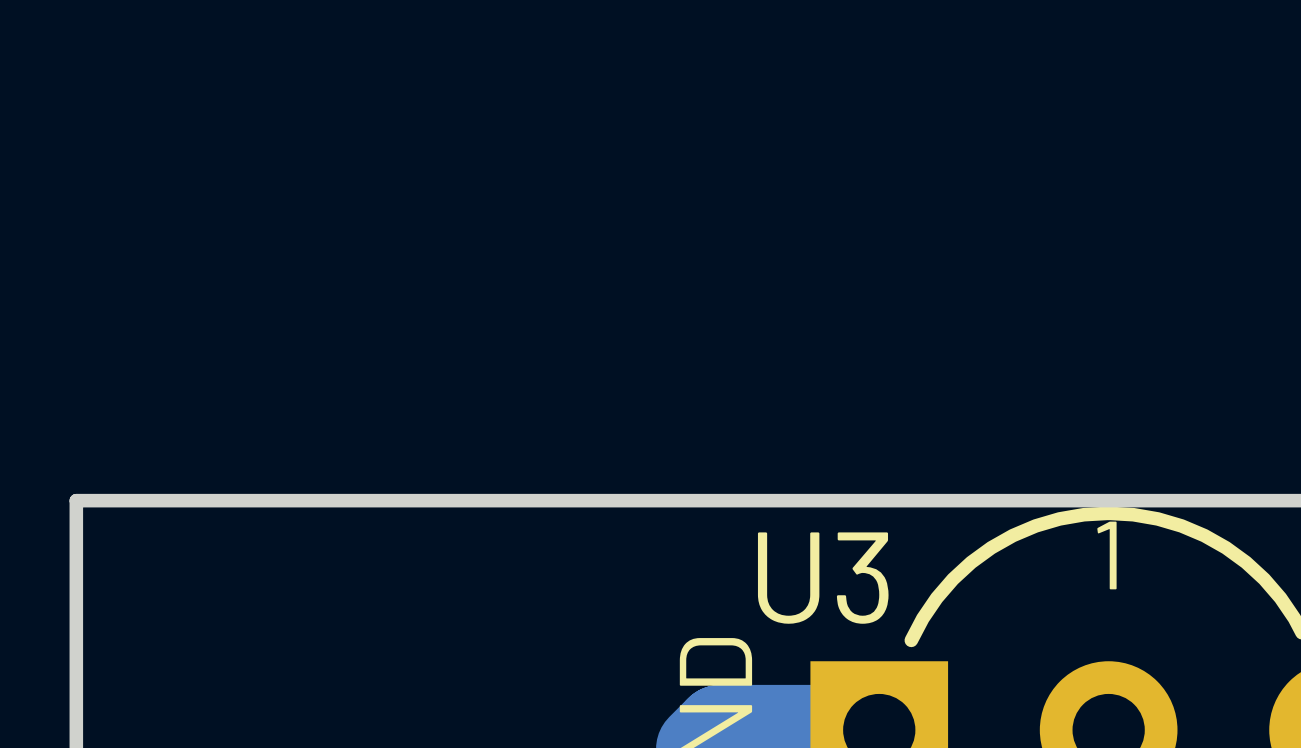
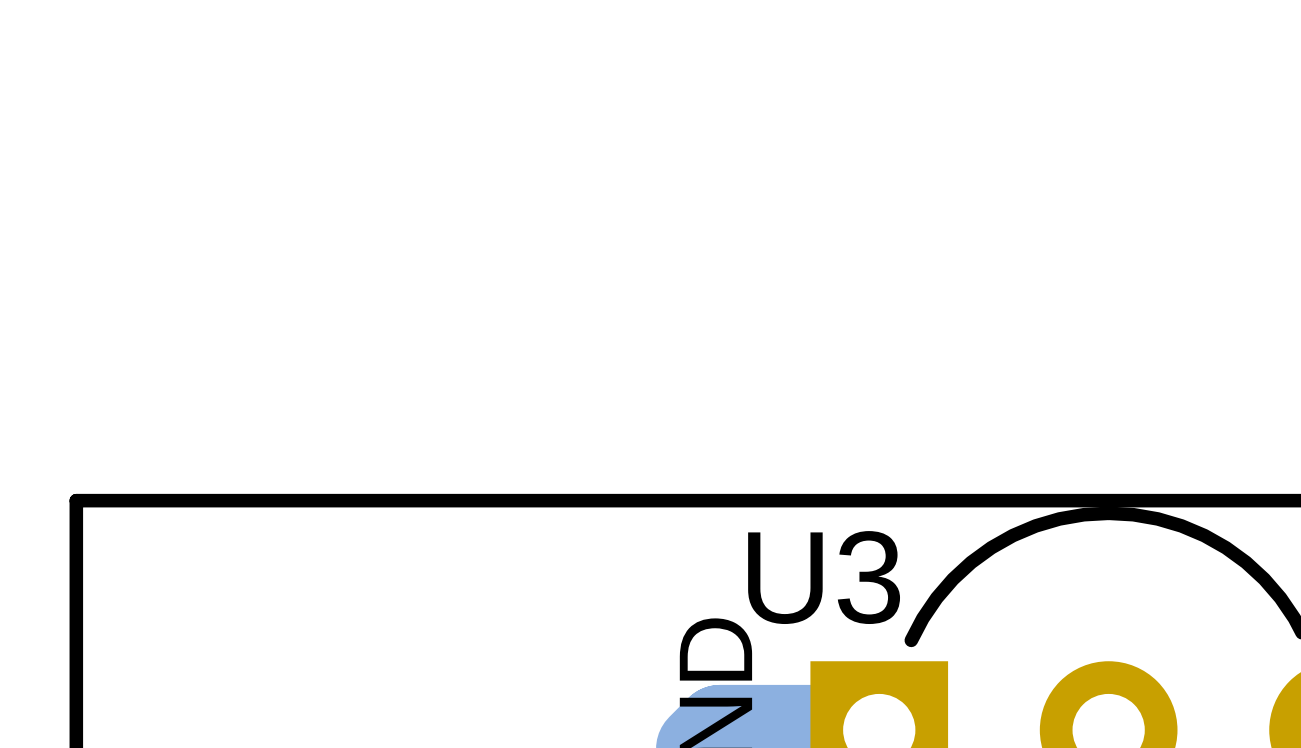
text: 1 (1106, 555) -> none

